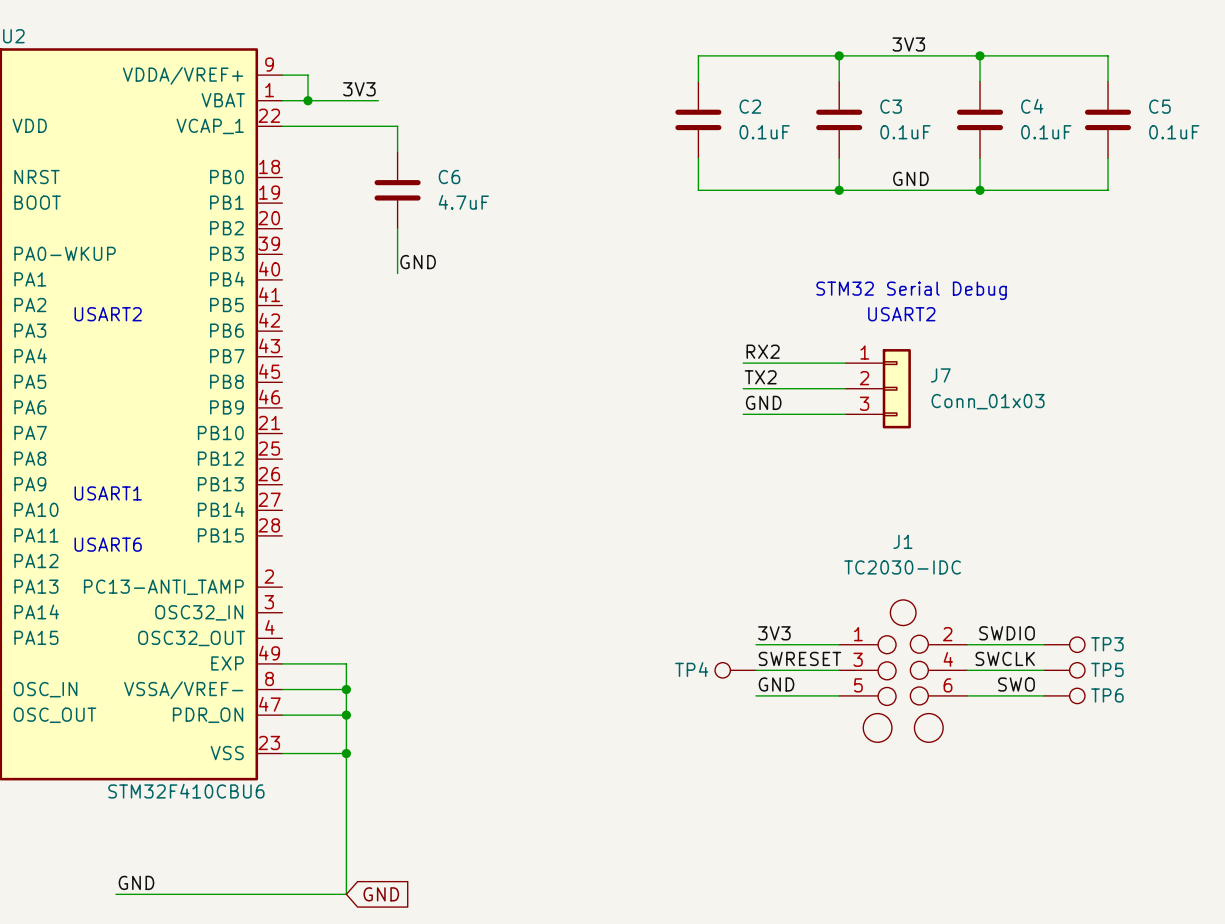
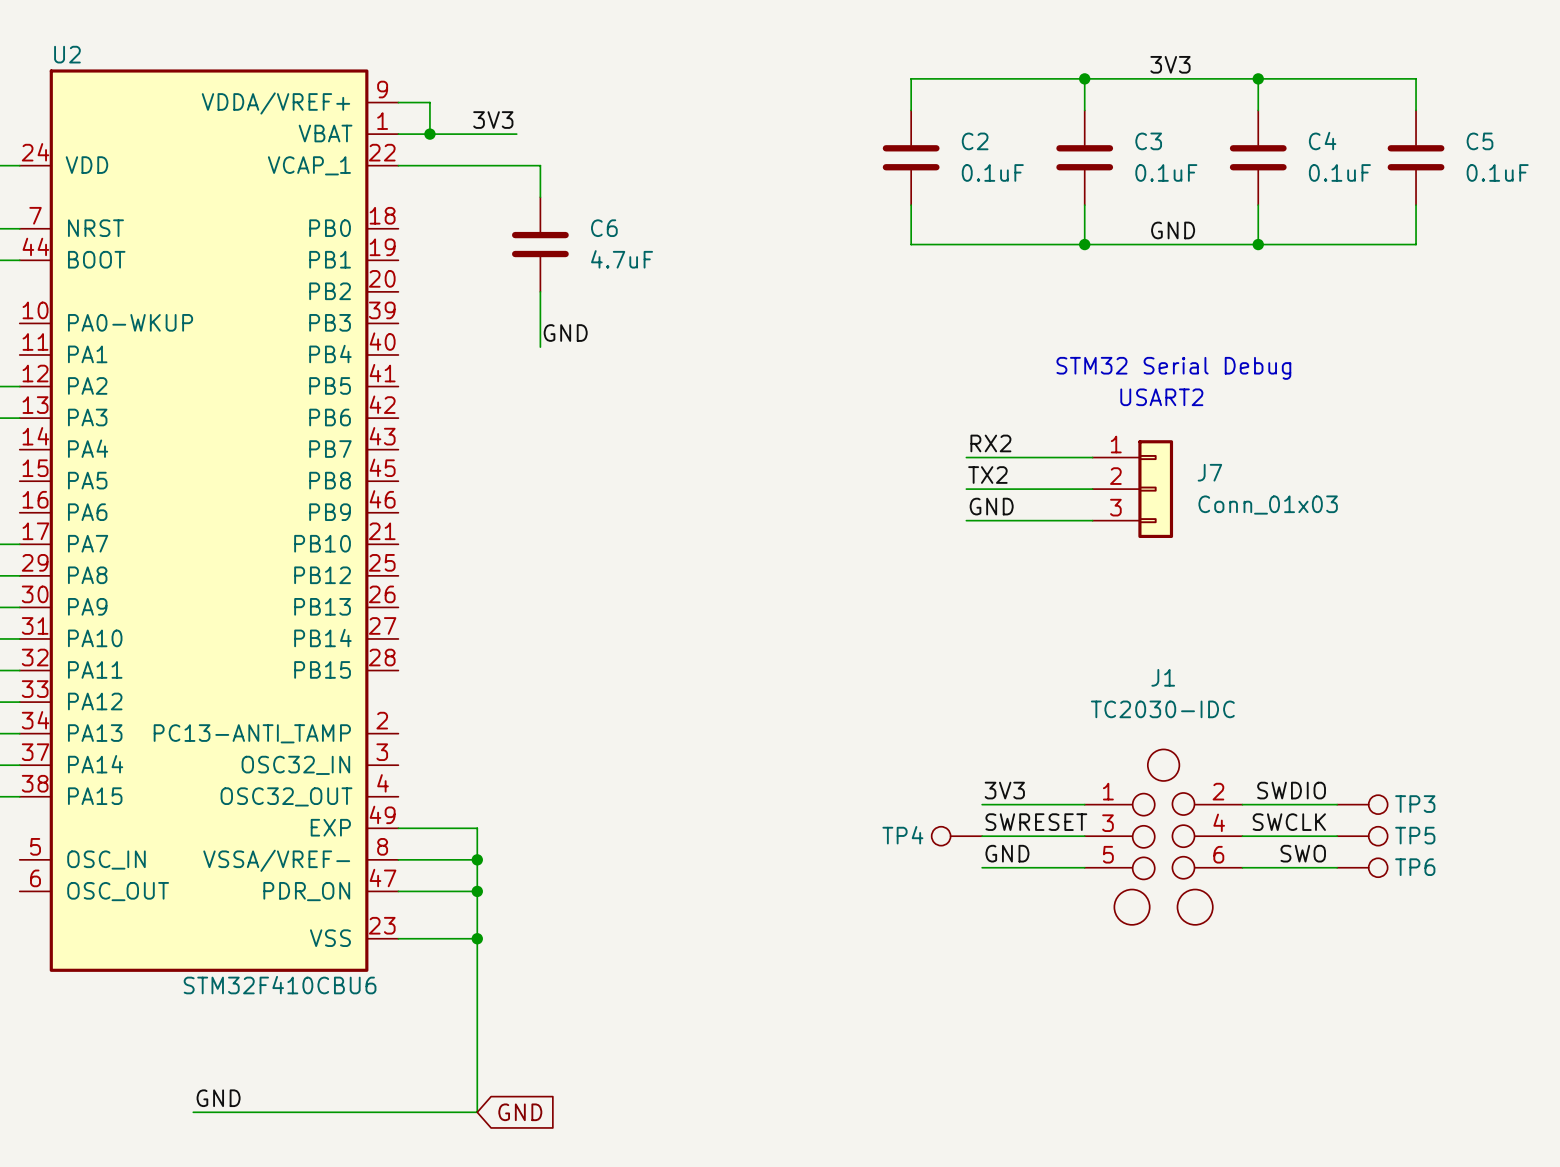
text: USART2 (108, 314) -> none
text: USART1 (108, 493) -> none
text: USART6 (108, 544) -> none

